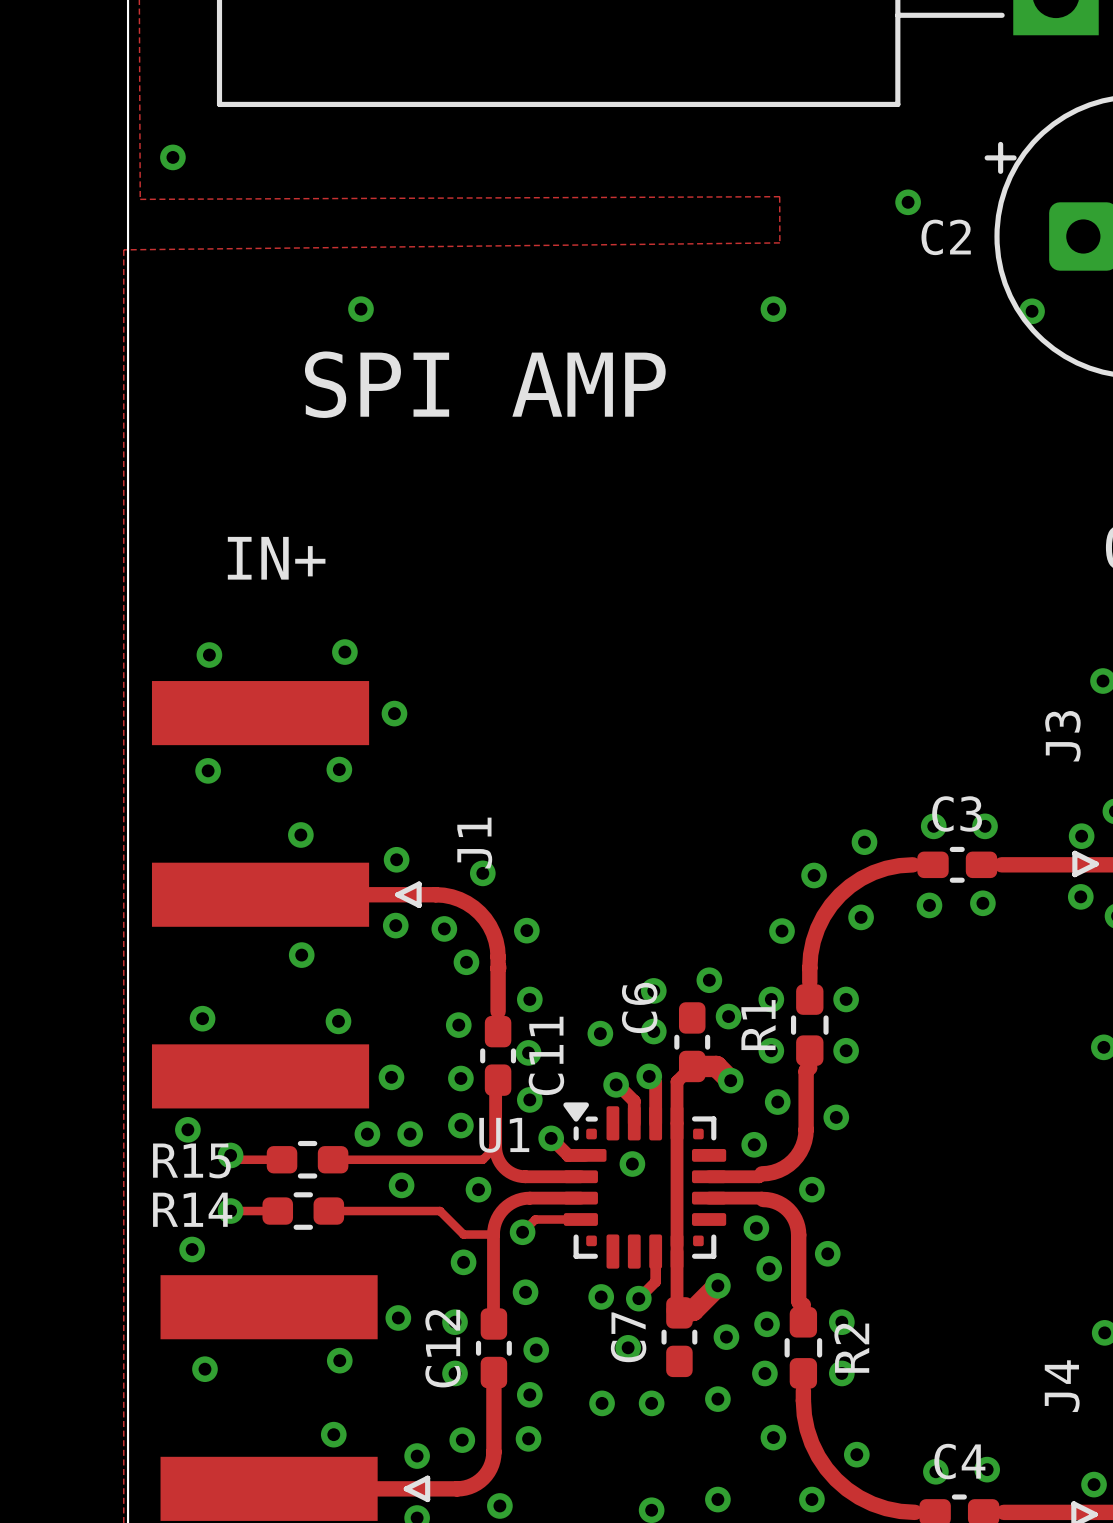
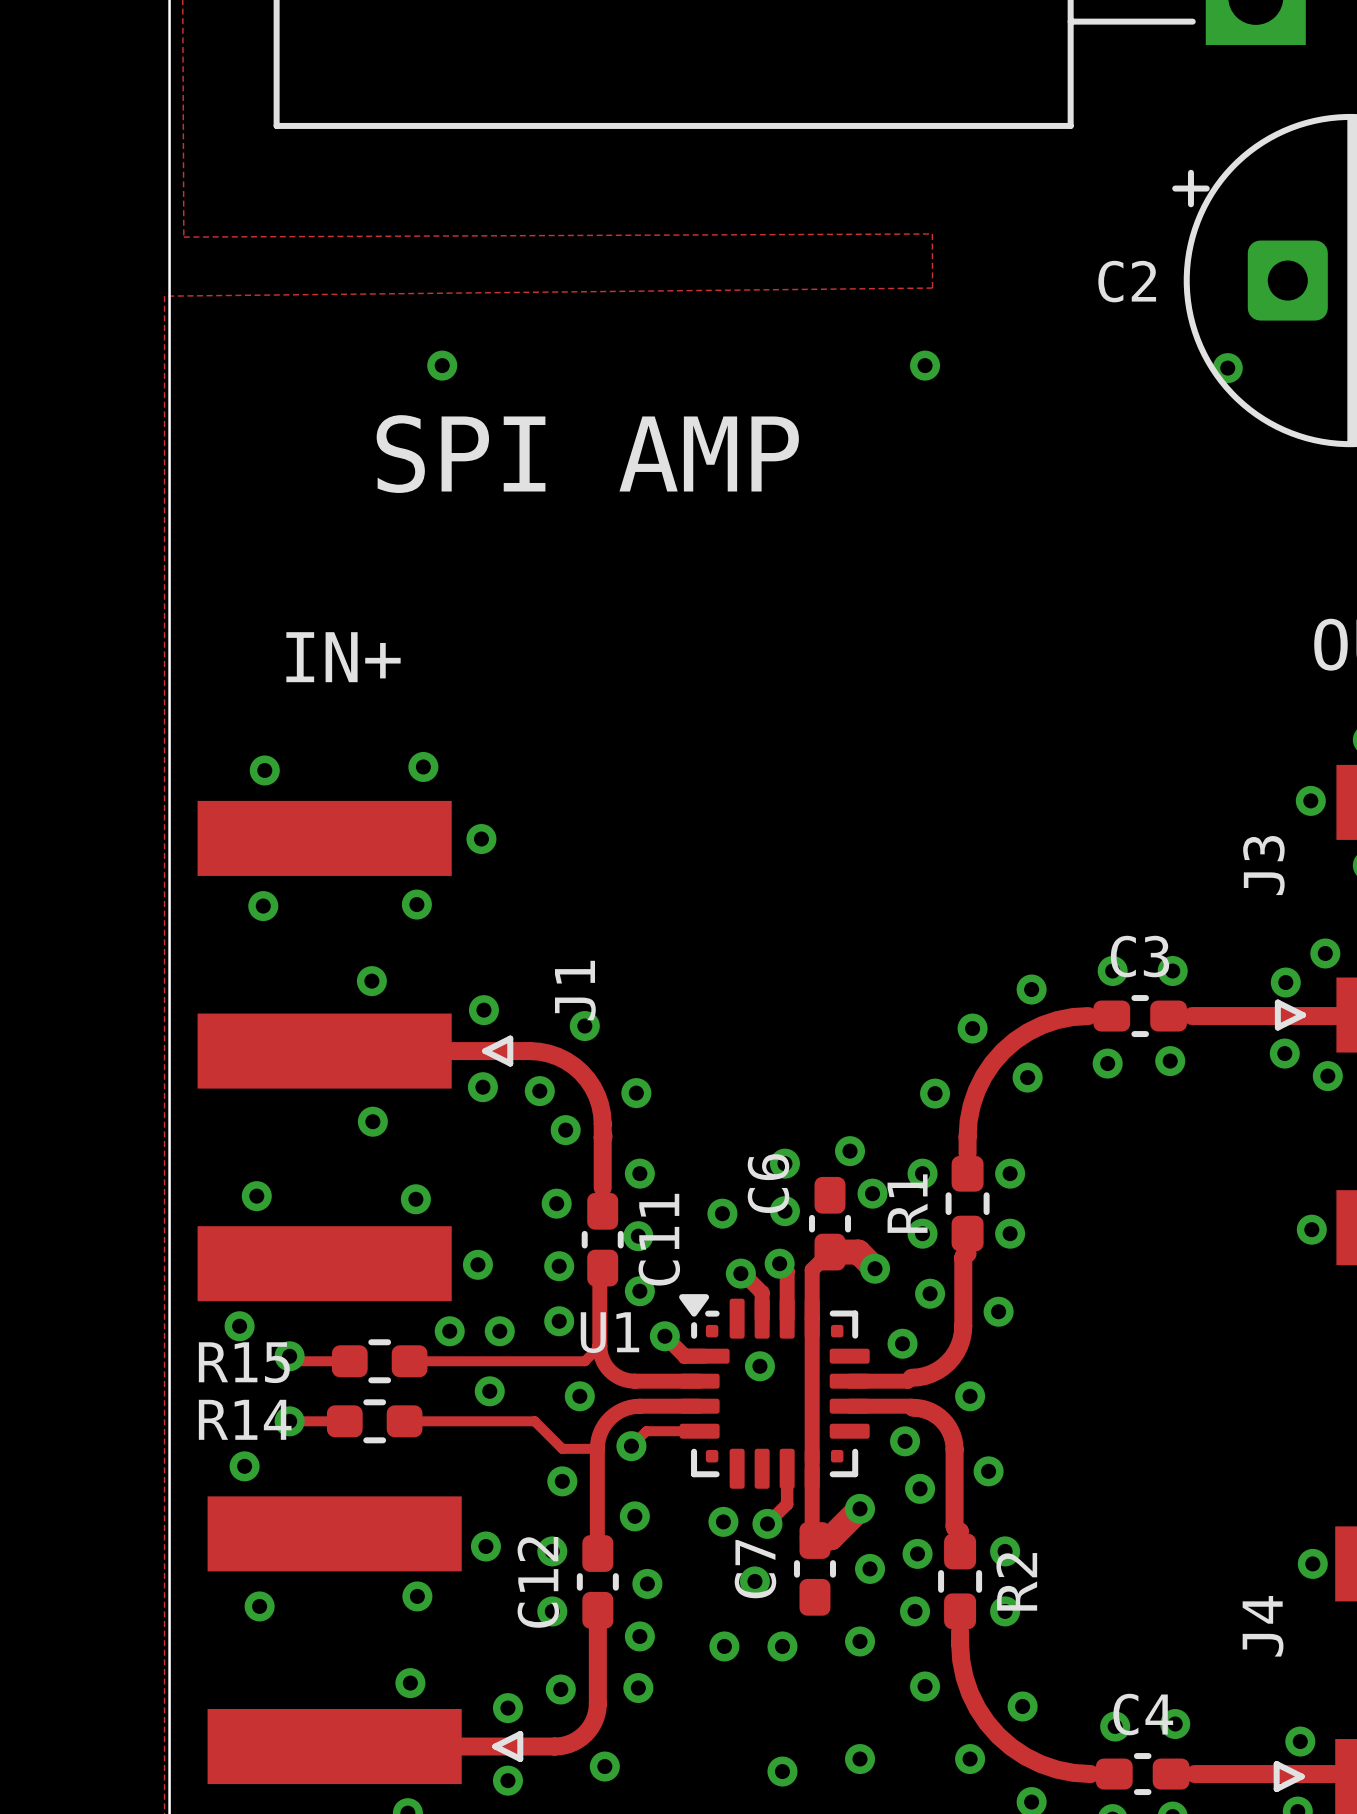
via: (172, 157) -> none
via: (908, 202) -> none

